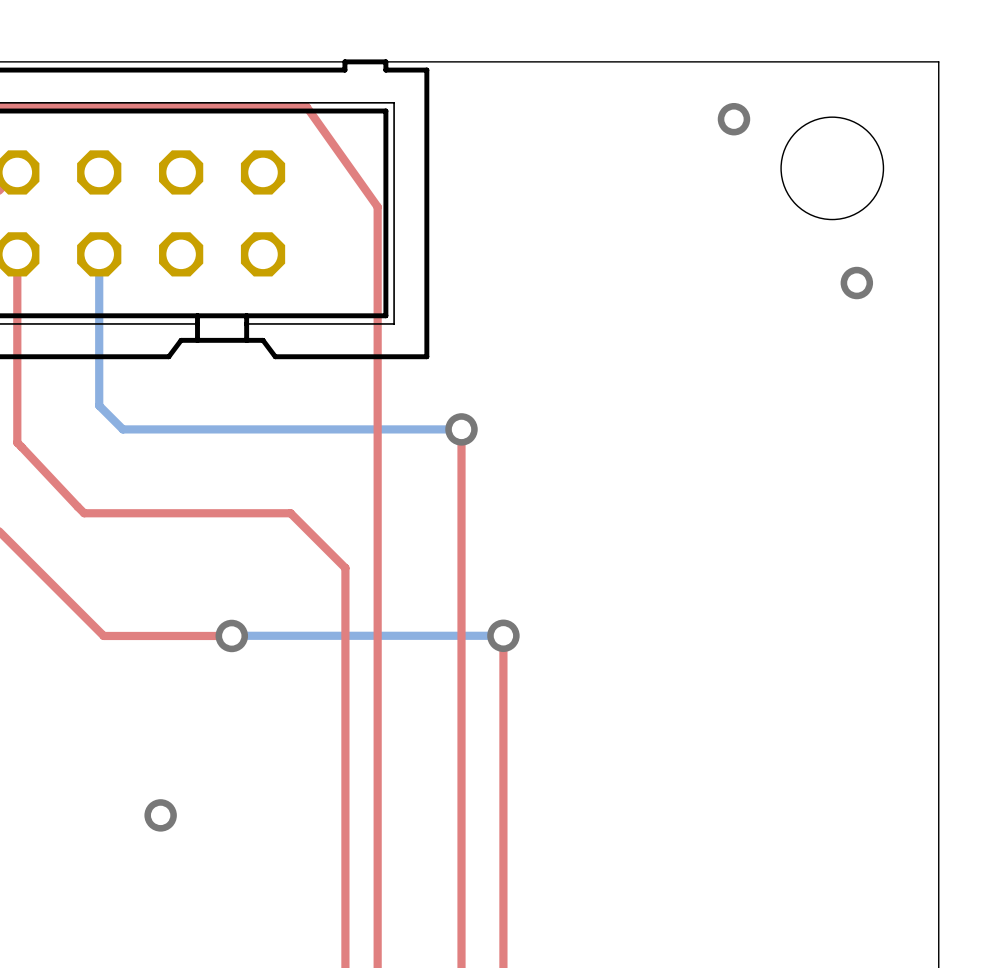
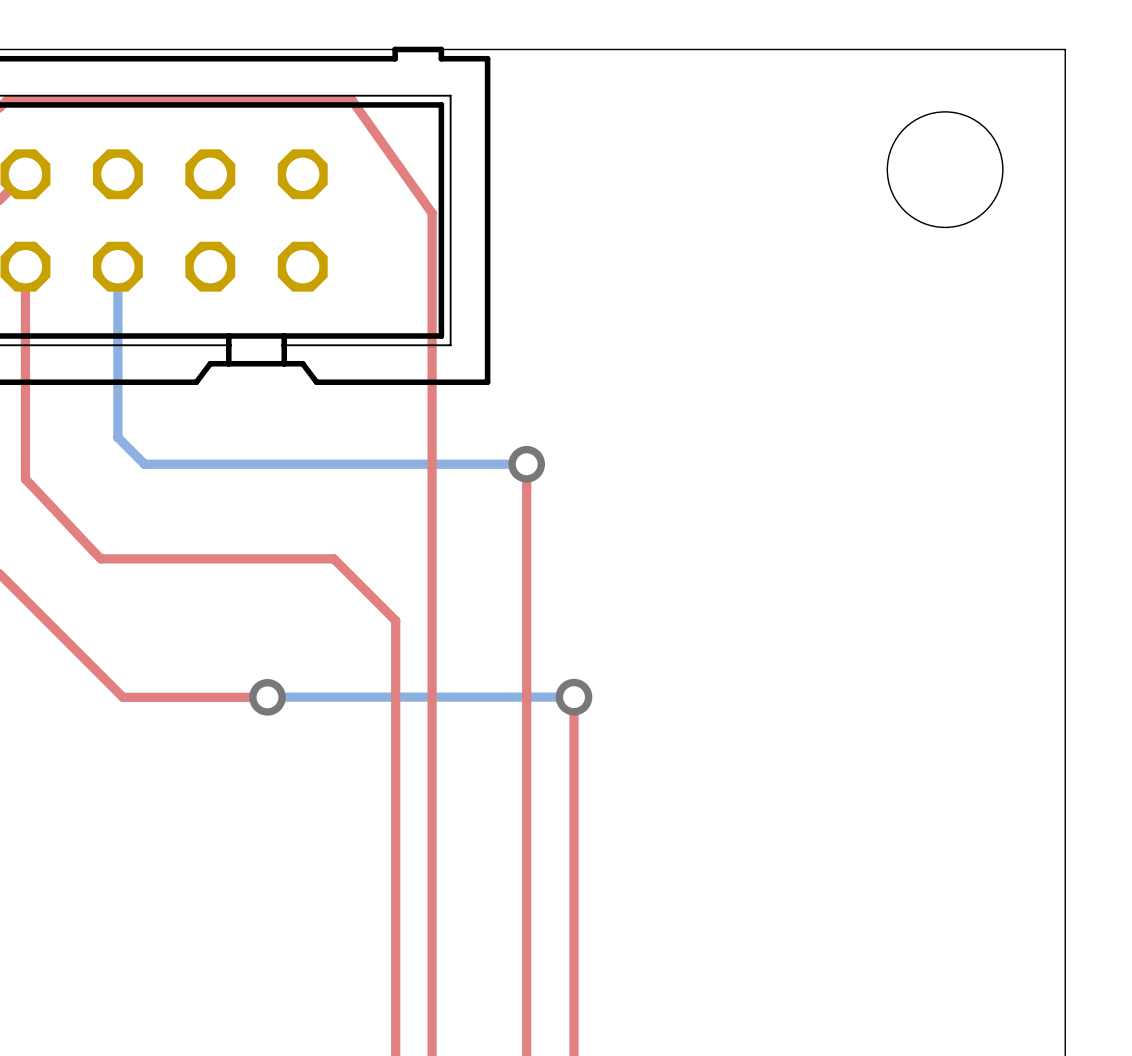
via: (733, 119) -> none
via: (856, 283) -> none
via: (160, 815) -> none

